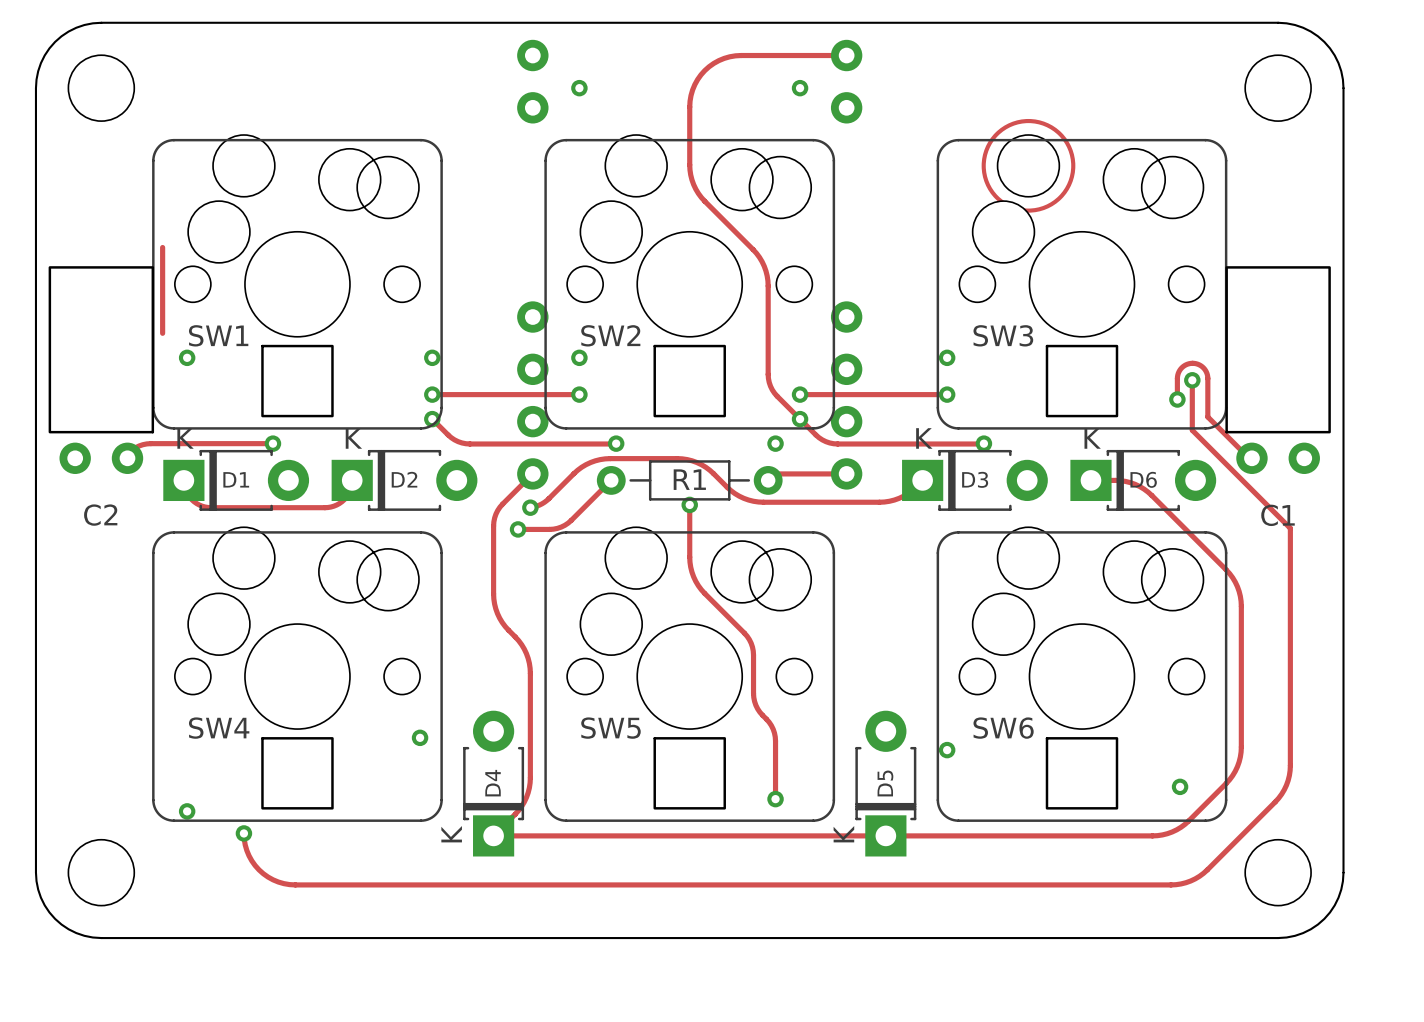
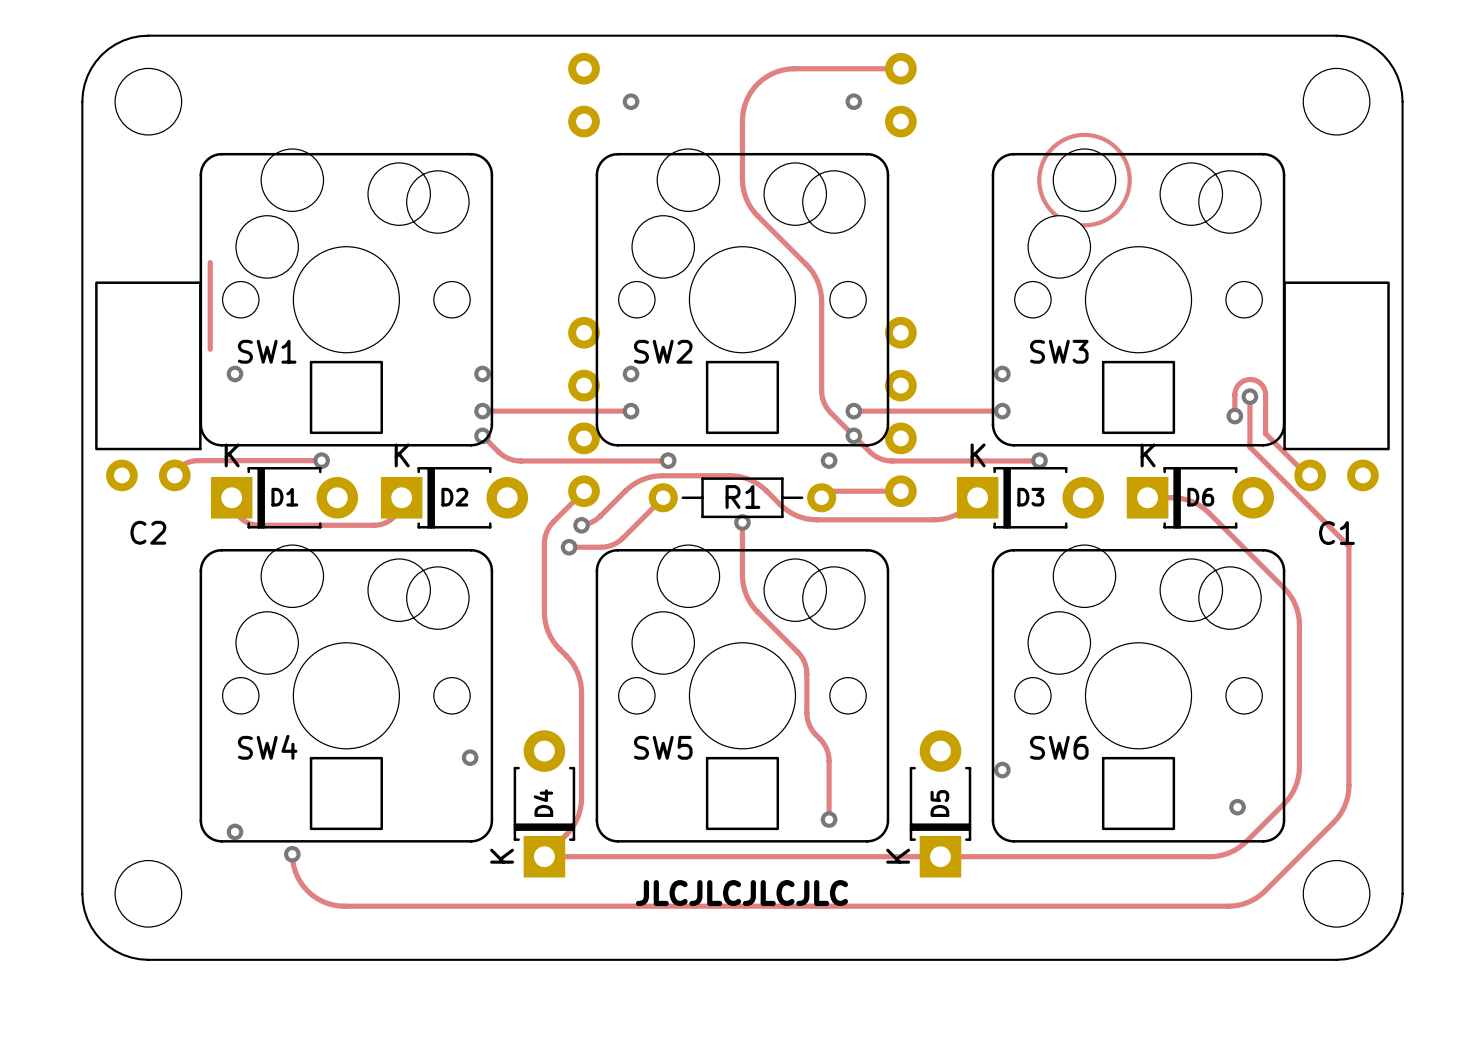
text: none -> JLCJLCJLCJLC (741, 893)

